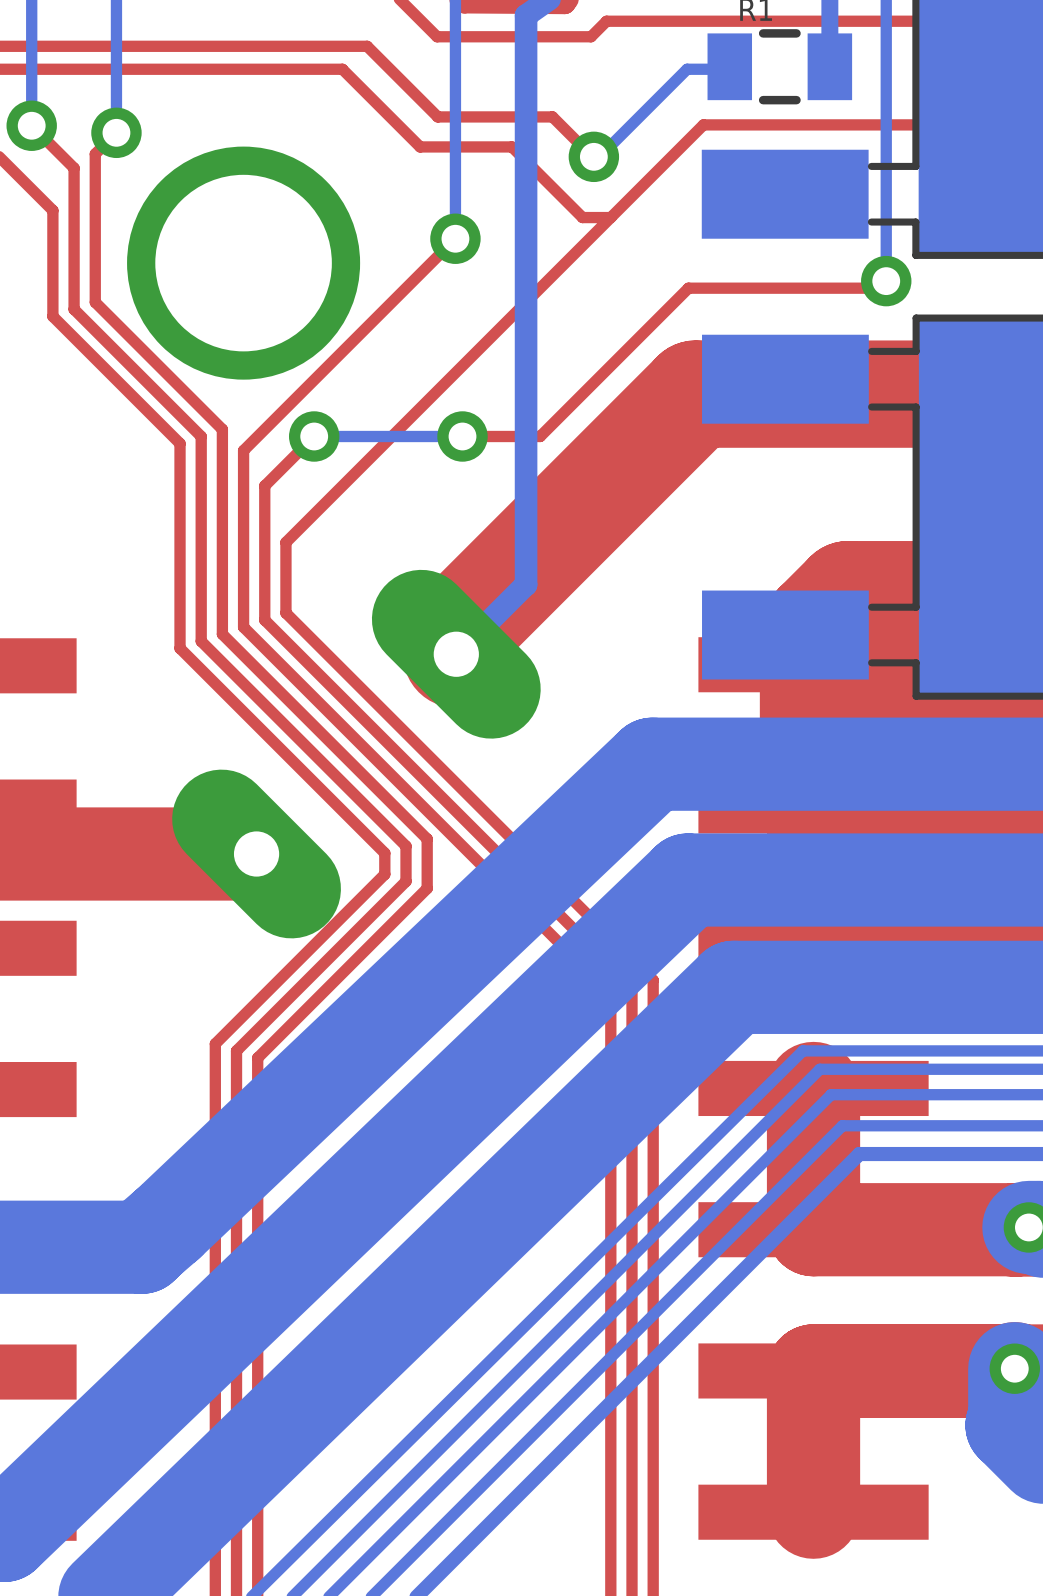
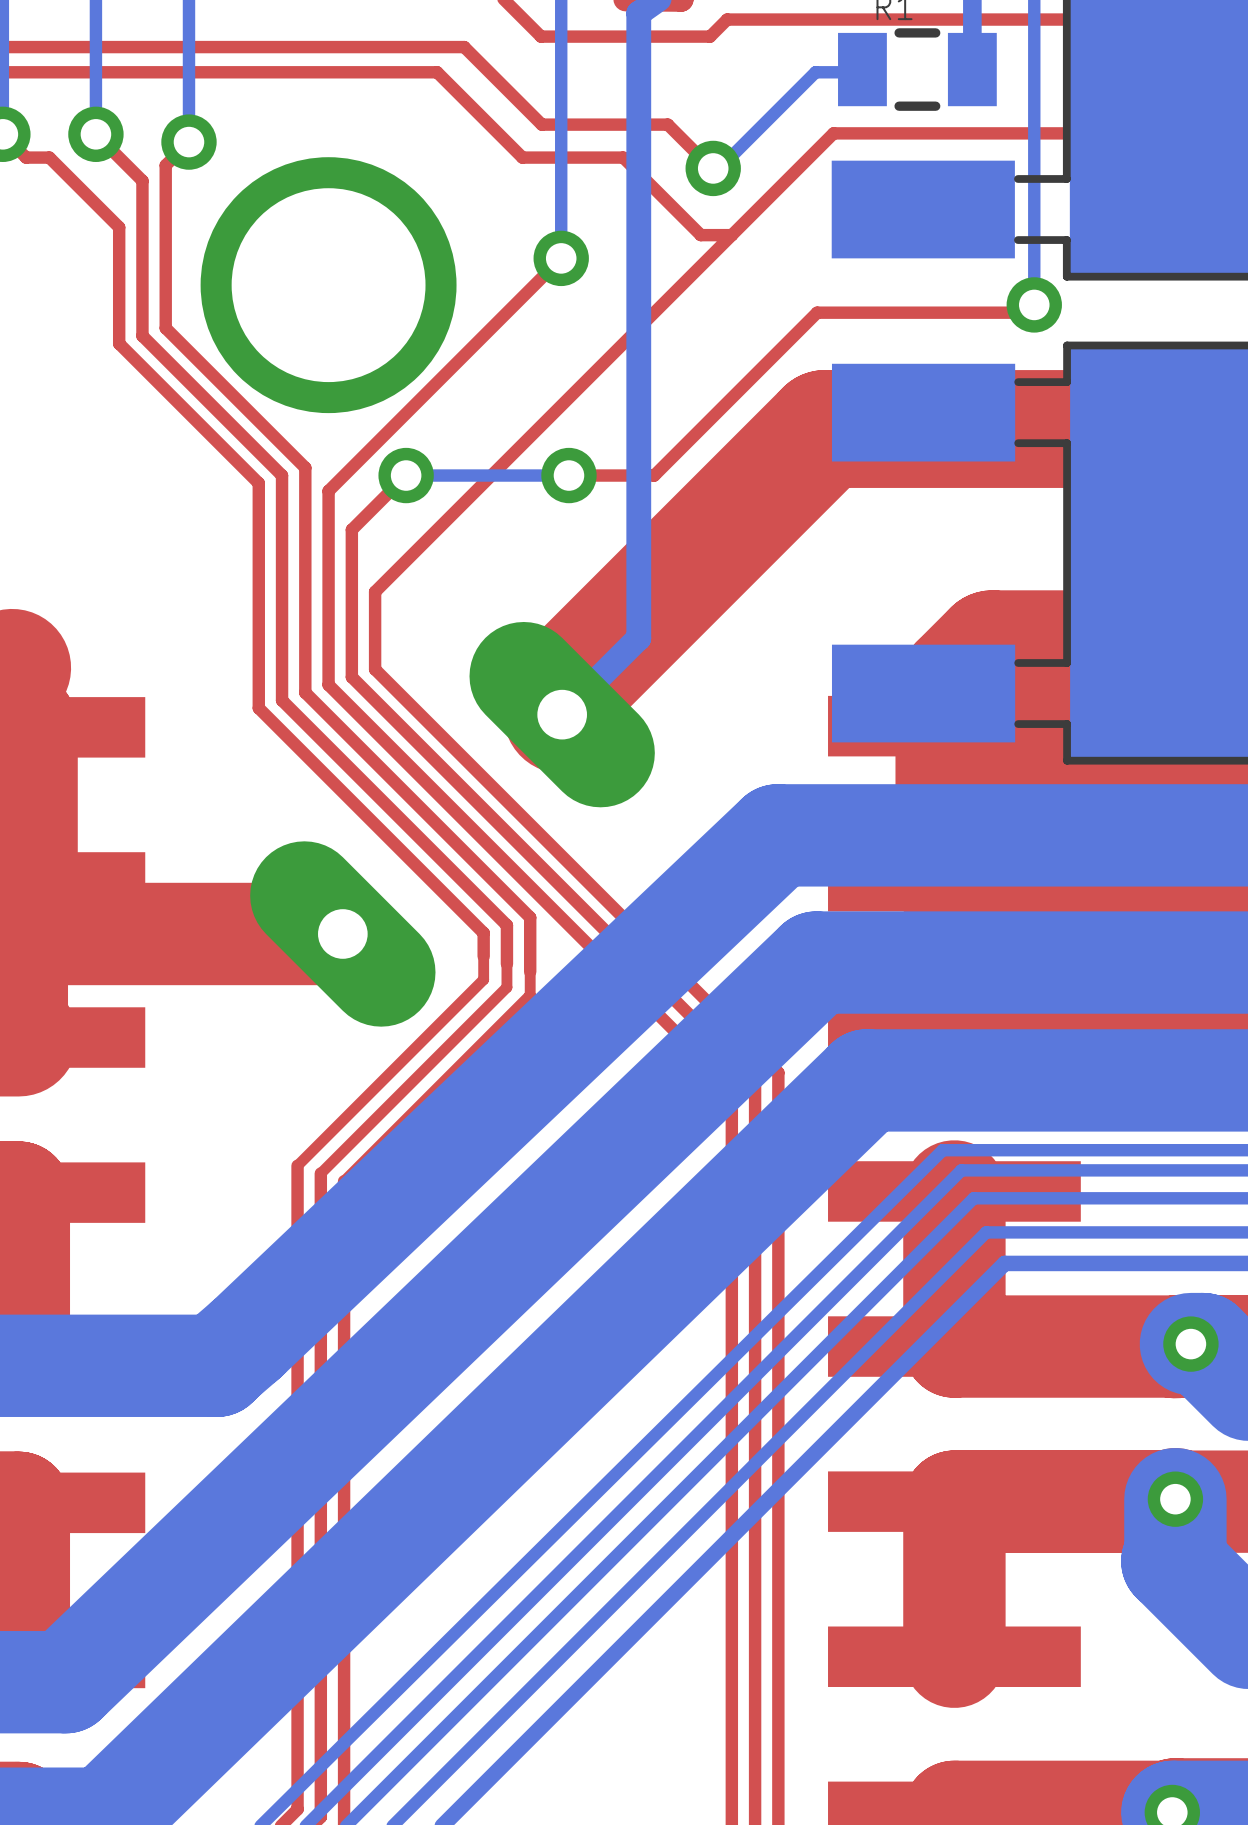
top track: (384, 874) (215, 1043) (215, 1065) -> (483, 956) (483, 979) (297, 1165)
top track: (406, 881) (236, 1050) (236, 1072) -> (506, 964) (506, 987) (320, 1173)
top track: (427, 888) (257, 1057) (257, 1079) -> (530, 971) (530, 995) (344, 1181)

